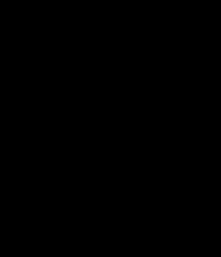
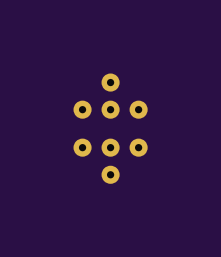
part: none -> (110, 128)

